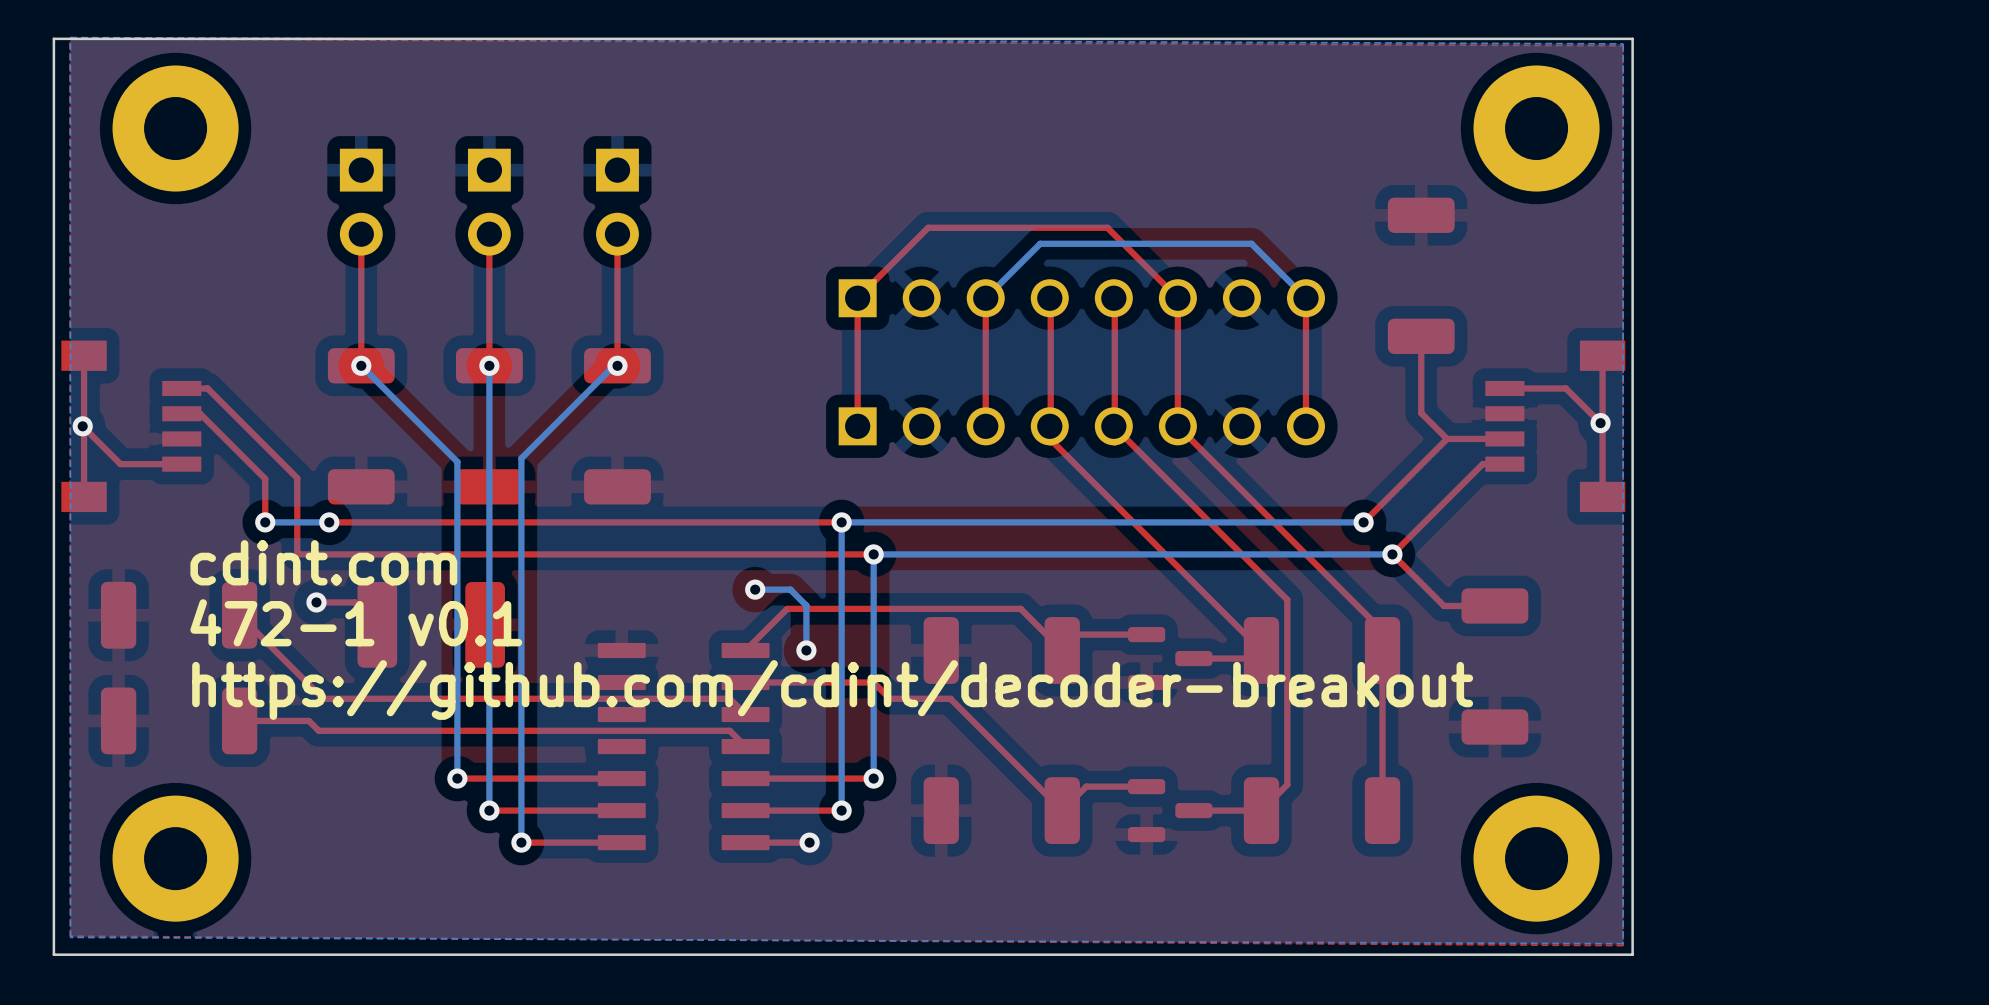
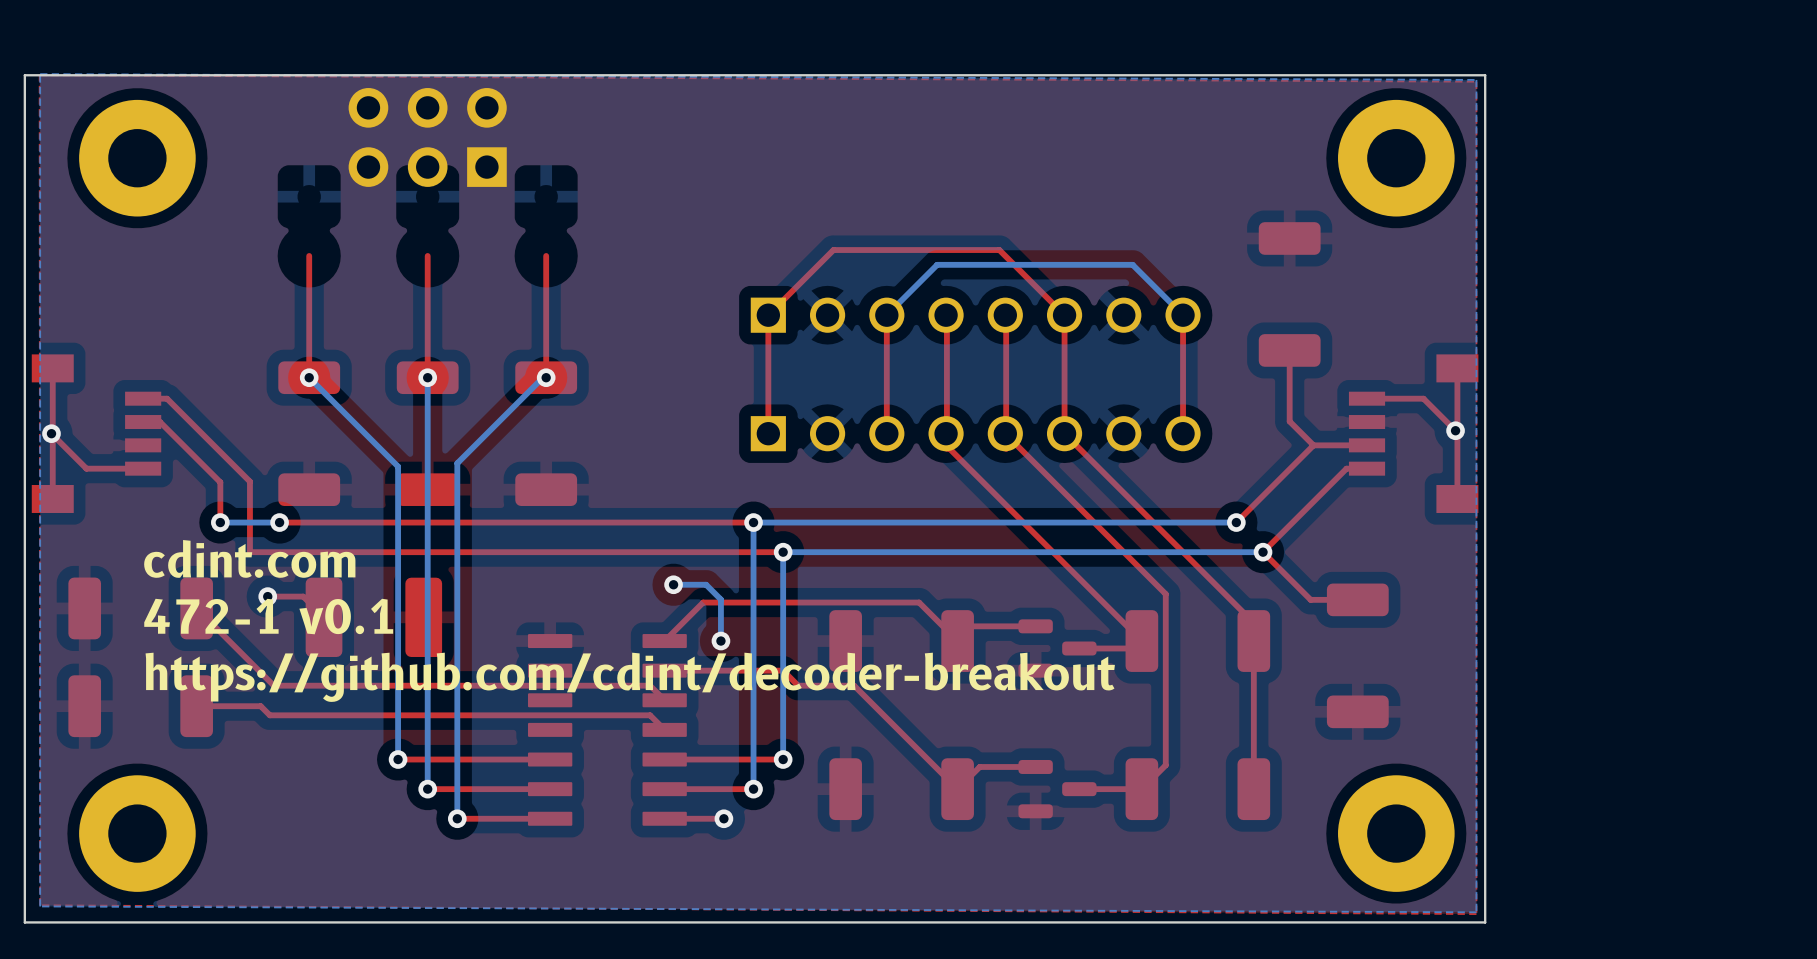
part: none -> (427, 137)
part: (361, 202) -> none
part: (489, 202) -> none
part: (617, 202) -> none

